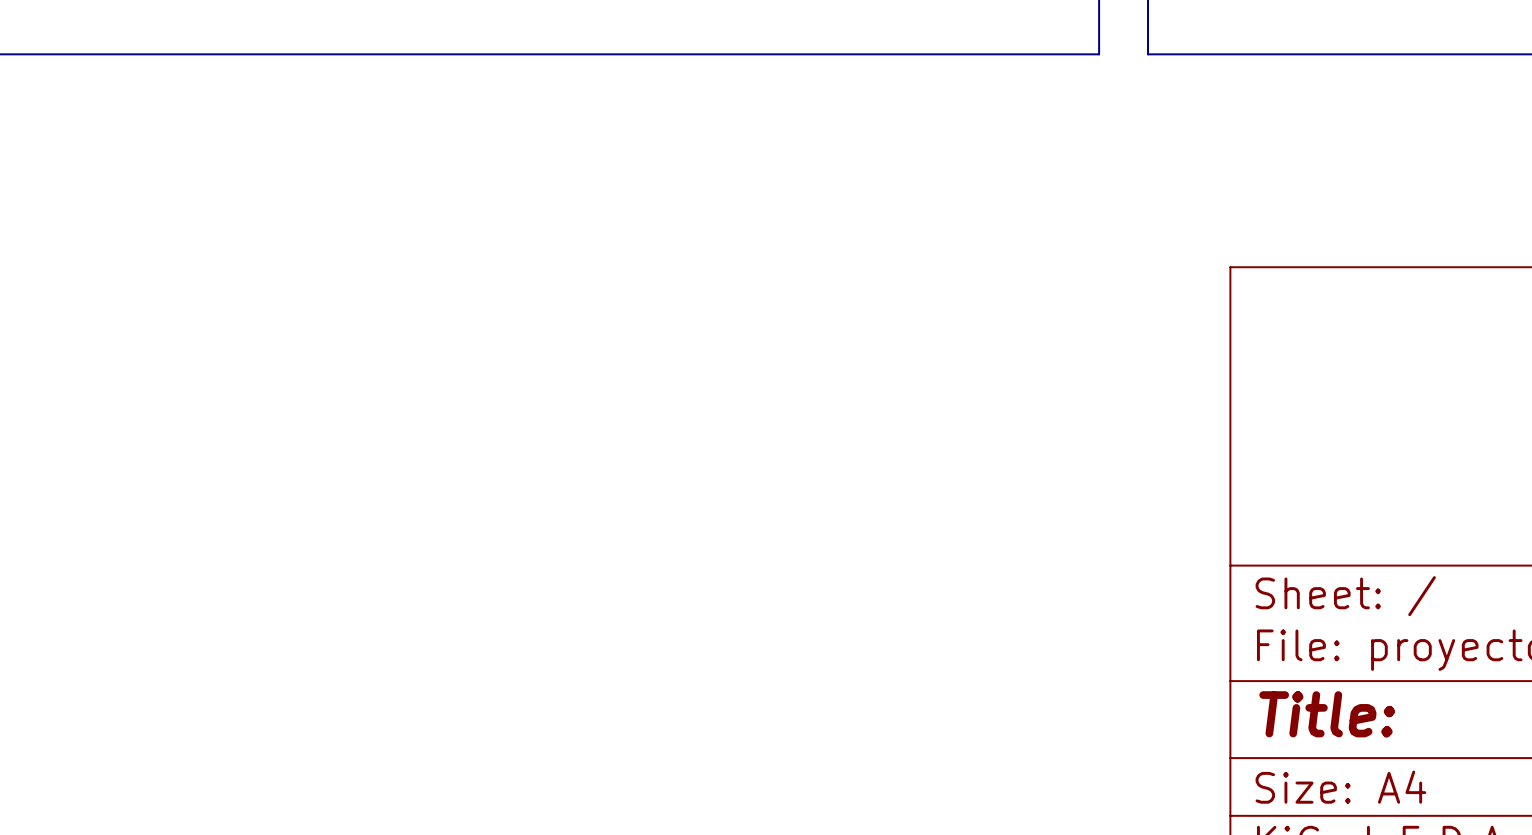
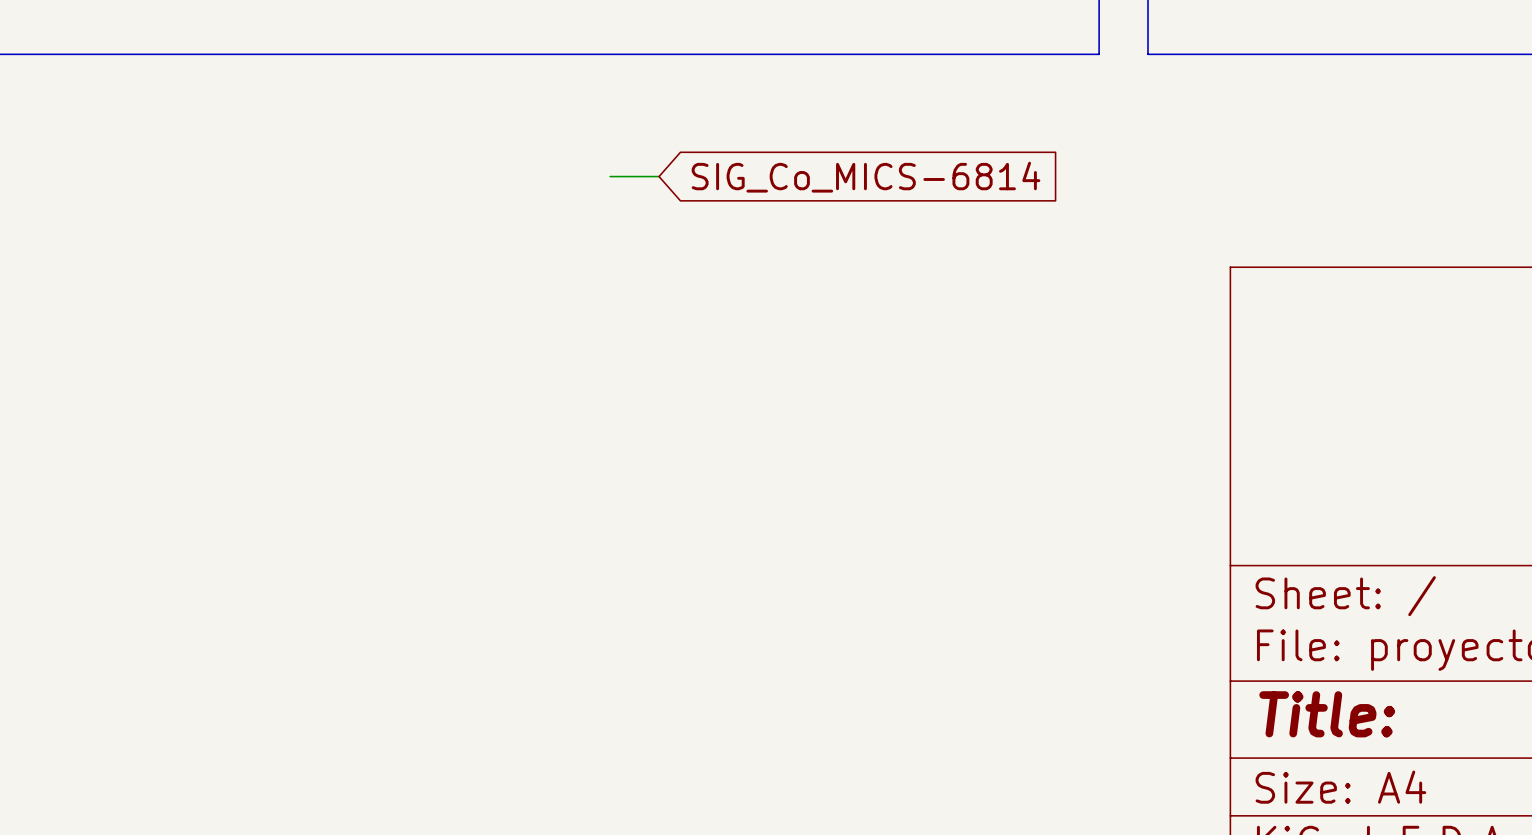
wire: none -> (610, 176) (659, 176)
global label: none -> SIG_Co_MICS-6814 (866, 177)

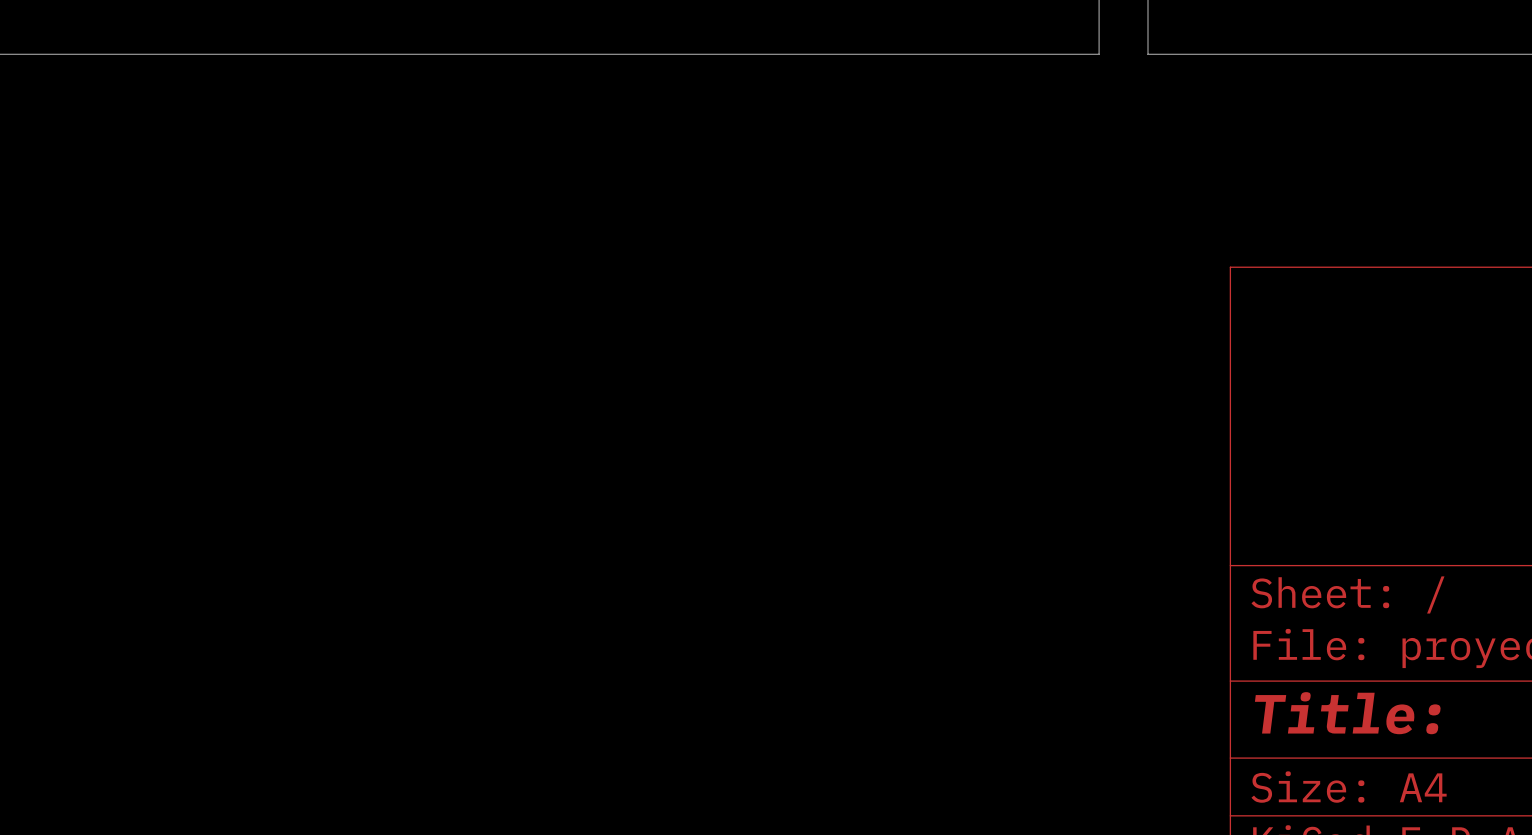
wire: (610, 176) (659, 176) -> none
global label: SIG_Co_MICS-6814 (866, 177) -> none

